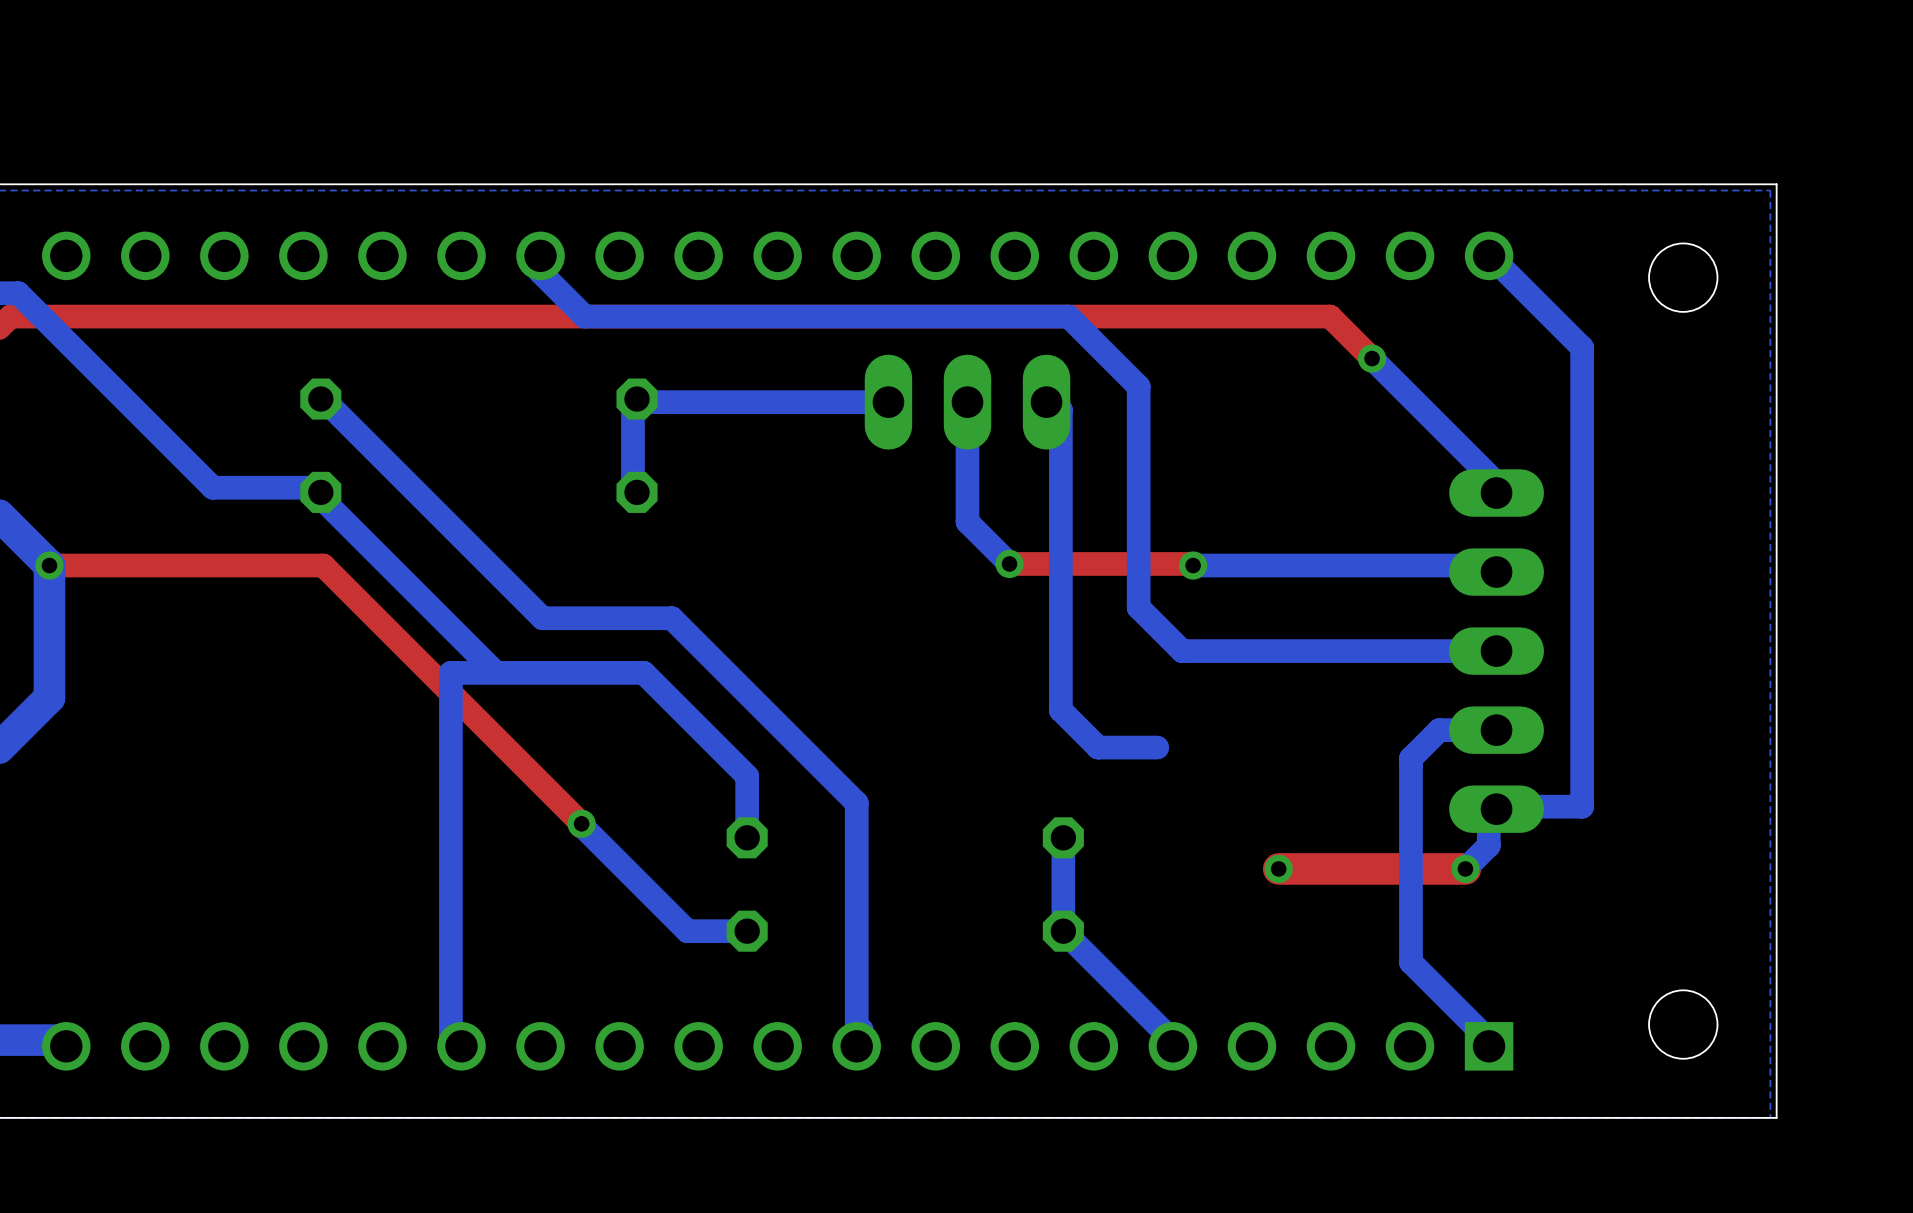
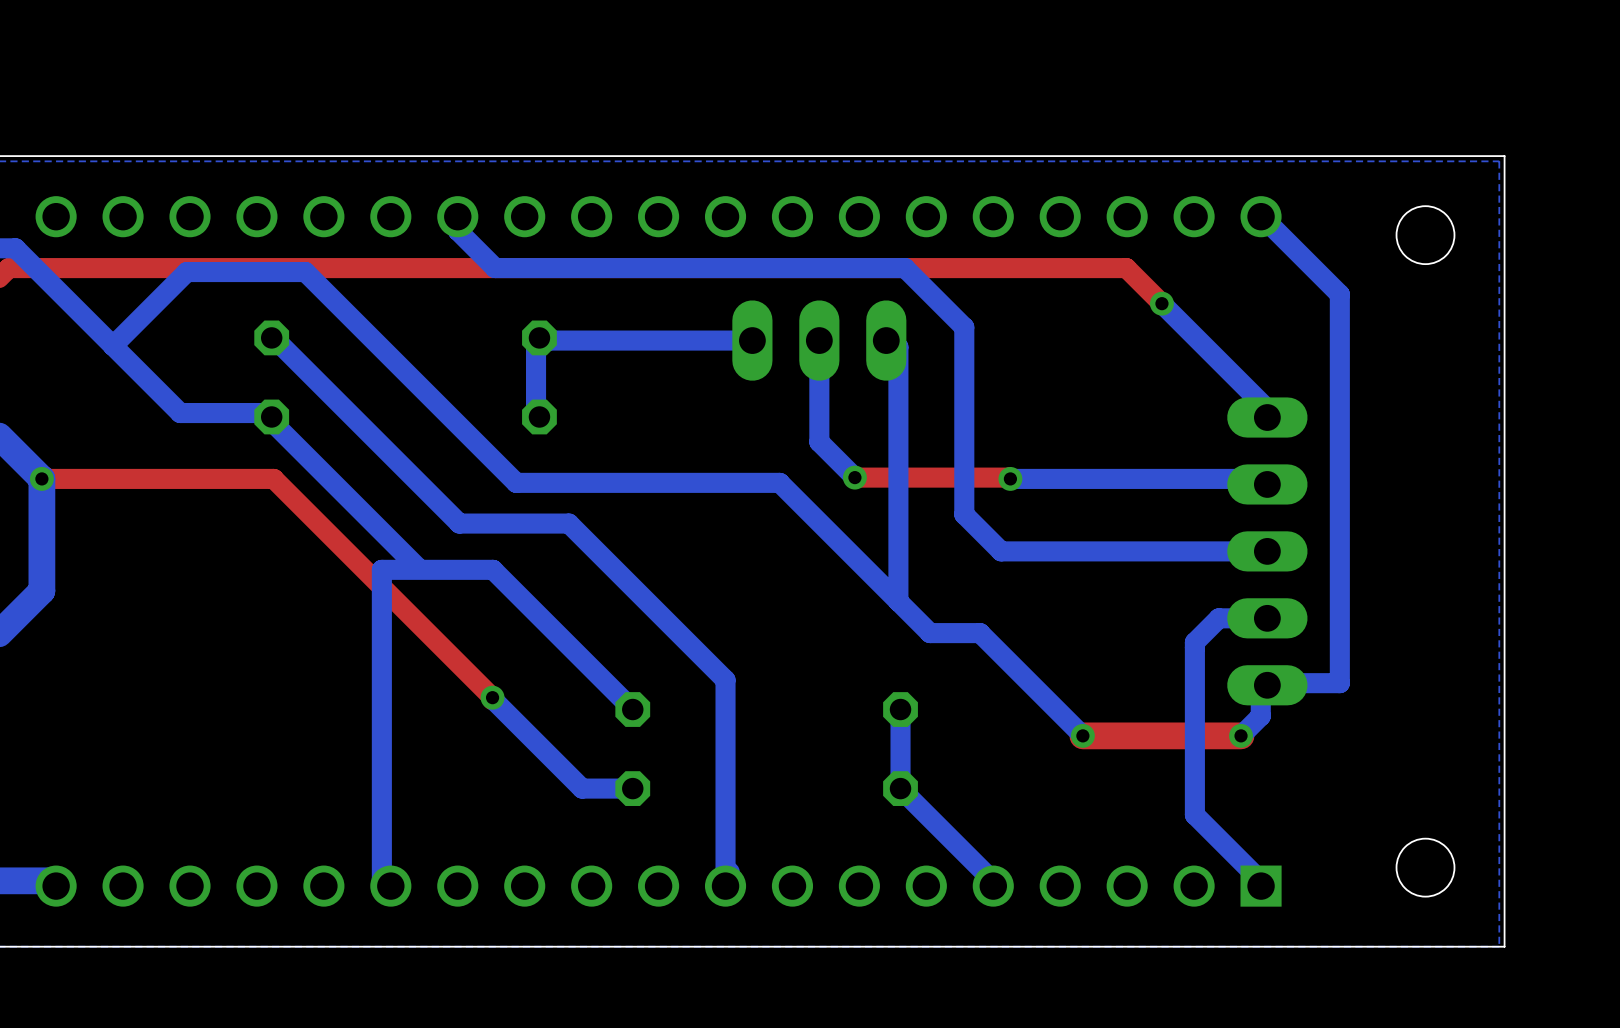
bottom track: none -> (113, 345) (186, 272) (305, 272) (516, 482) (779, 482) (898, 601)
bottom track: (582, 672) (643, 672) (747, 776) (747, 837) -> (493, 569) (632, 709)
bottom track: none -> (980, 633) (1082, 735)

